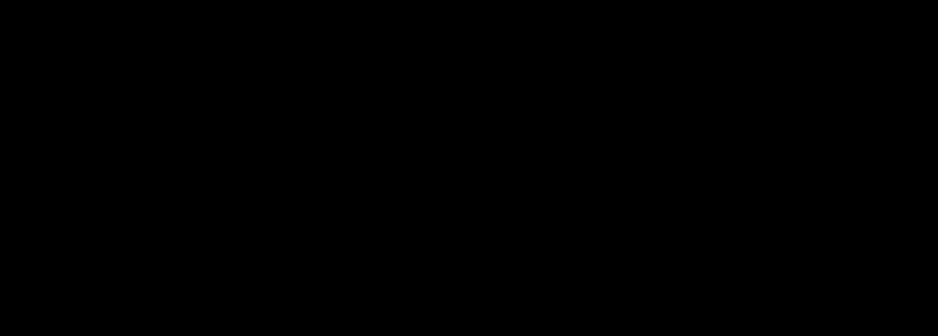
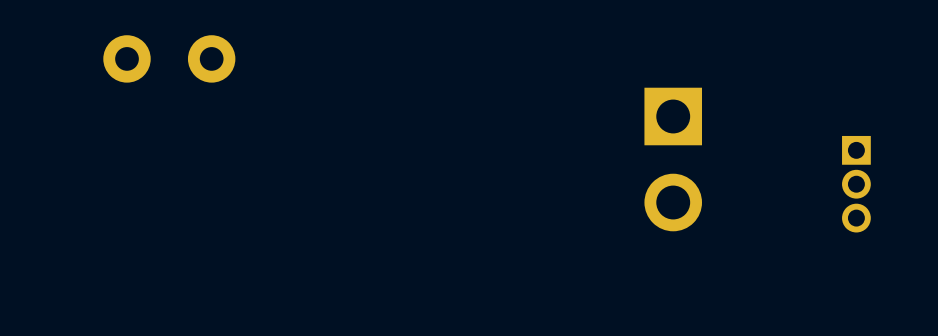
part: none -> (169, 58)
part: none -> (673, 159)
part: none -> (856, 184)

